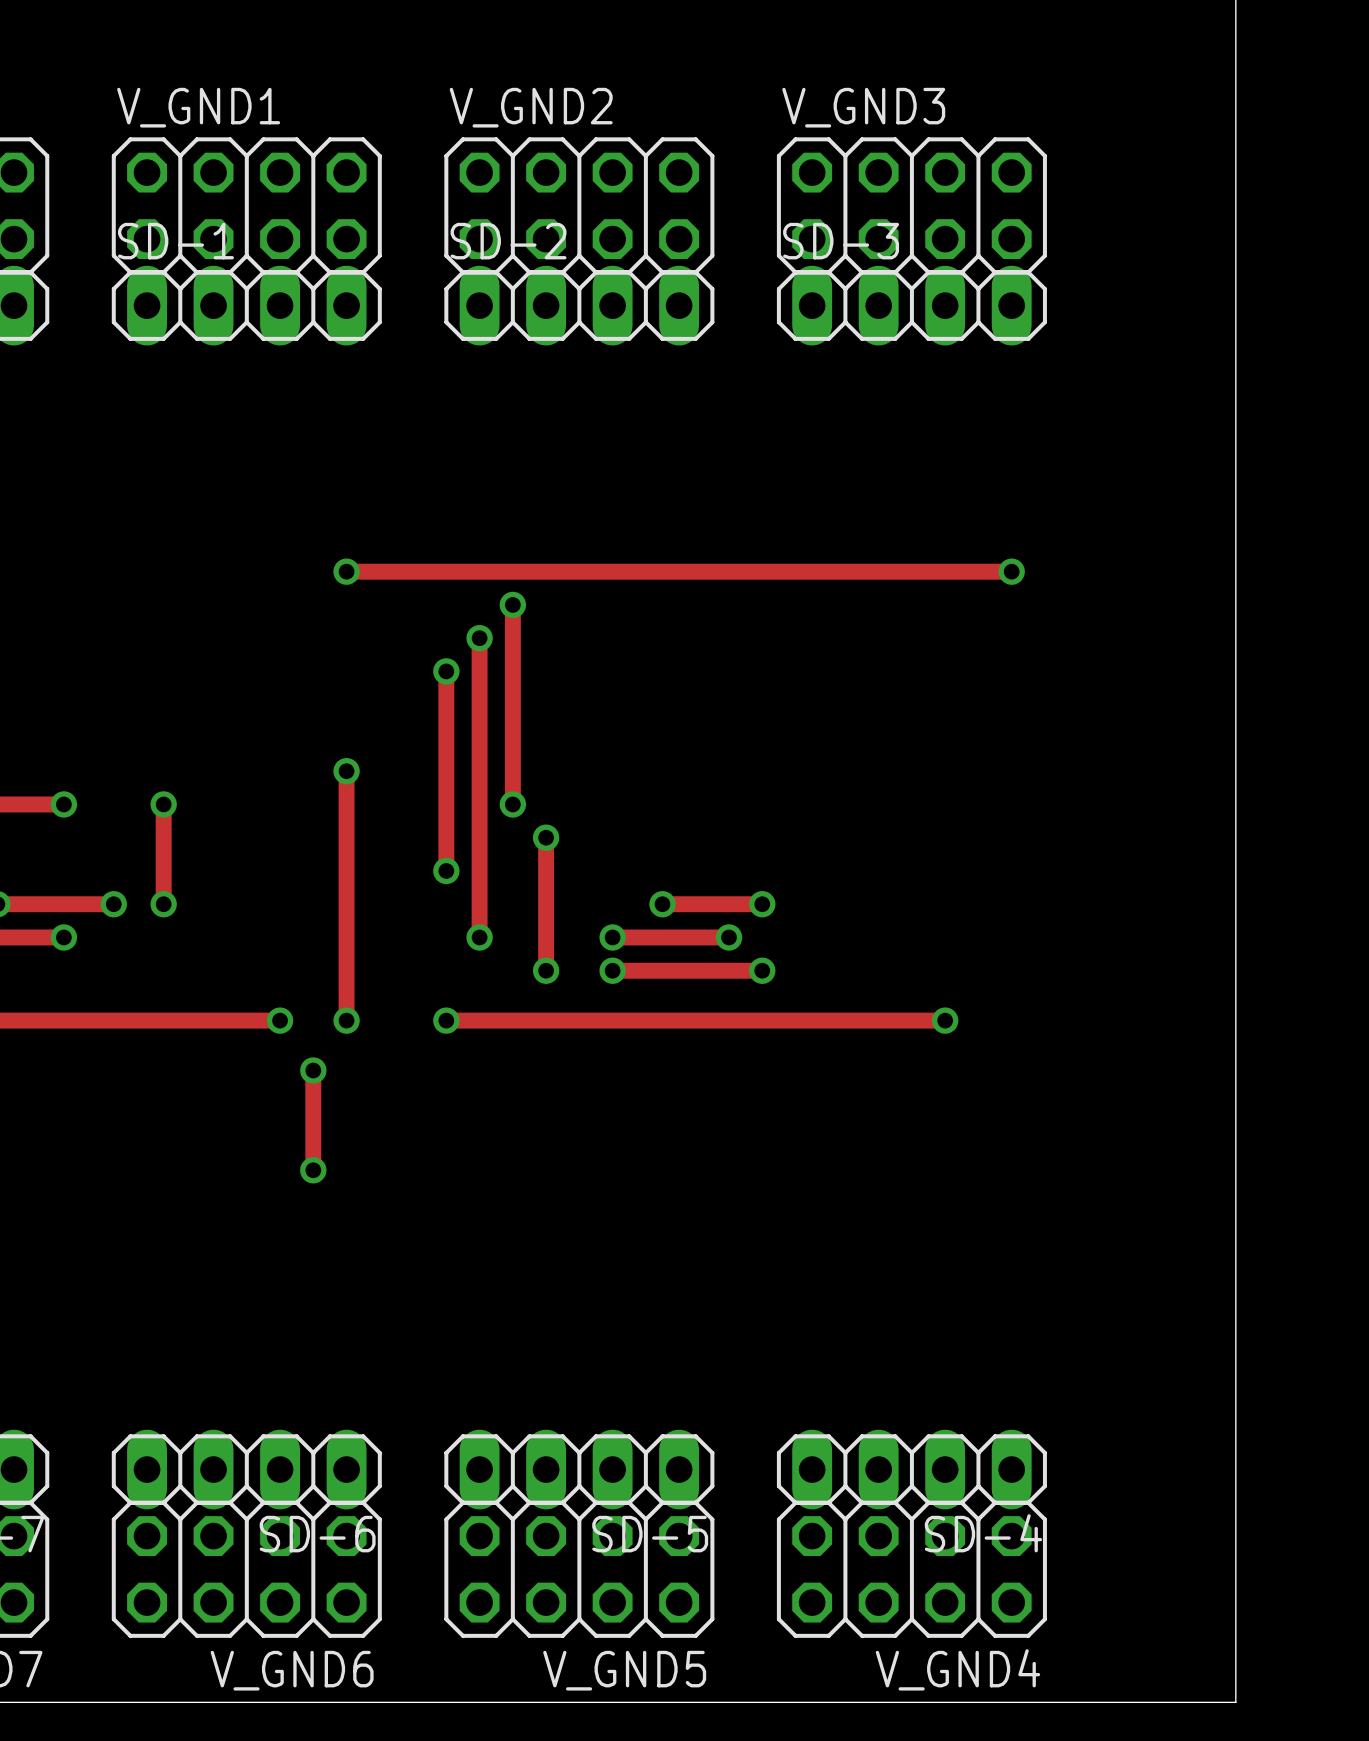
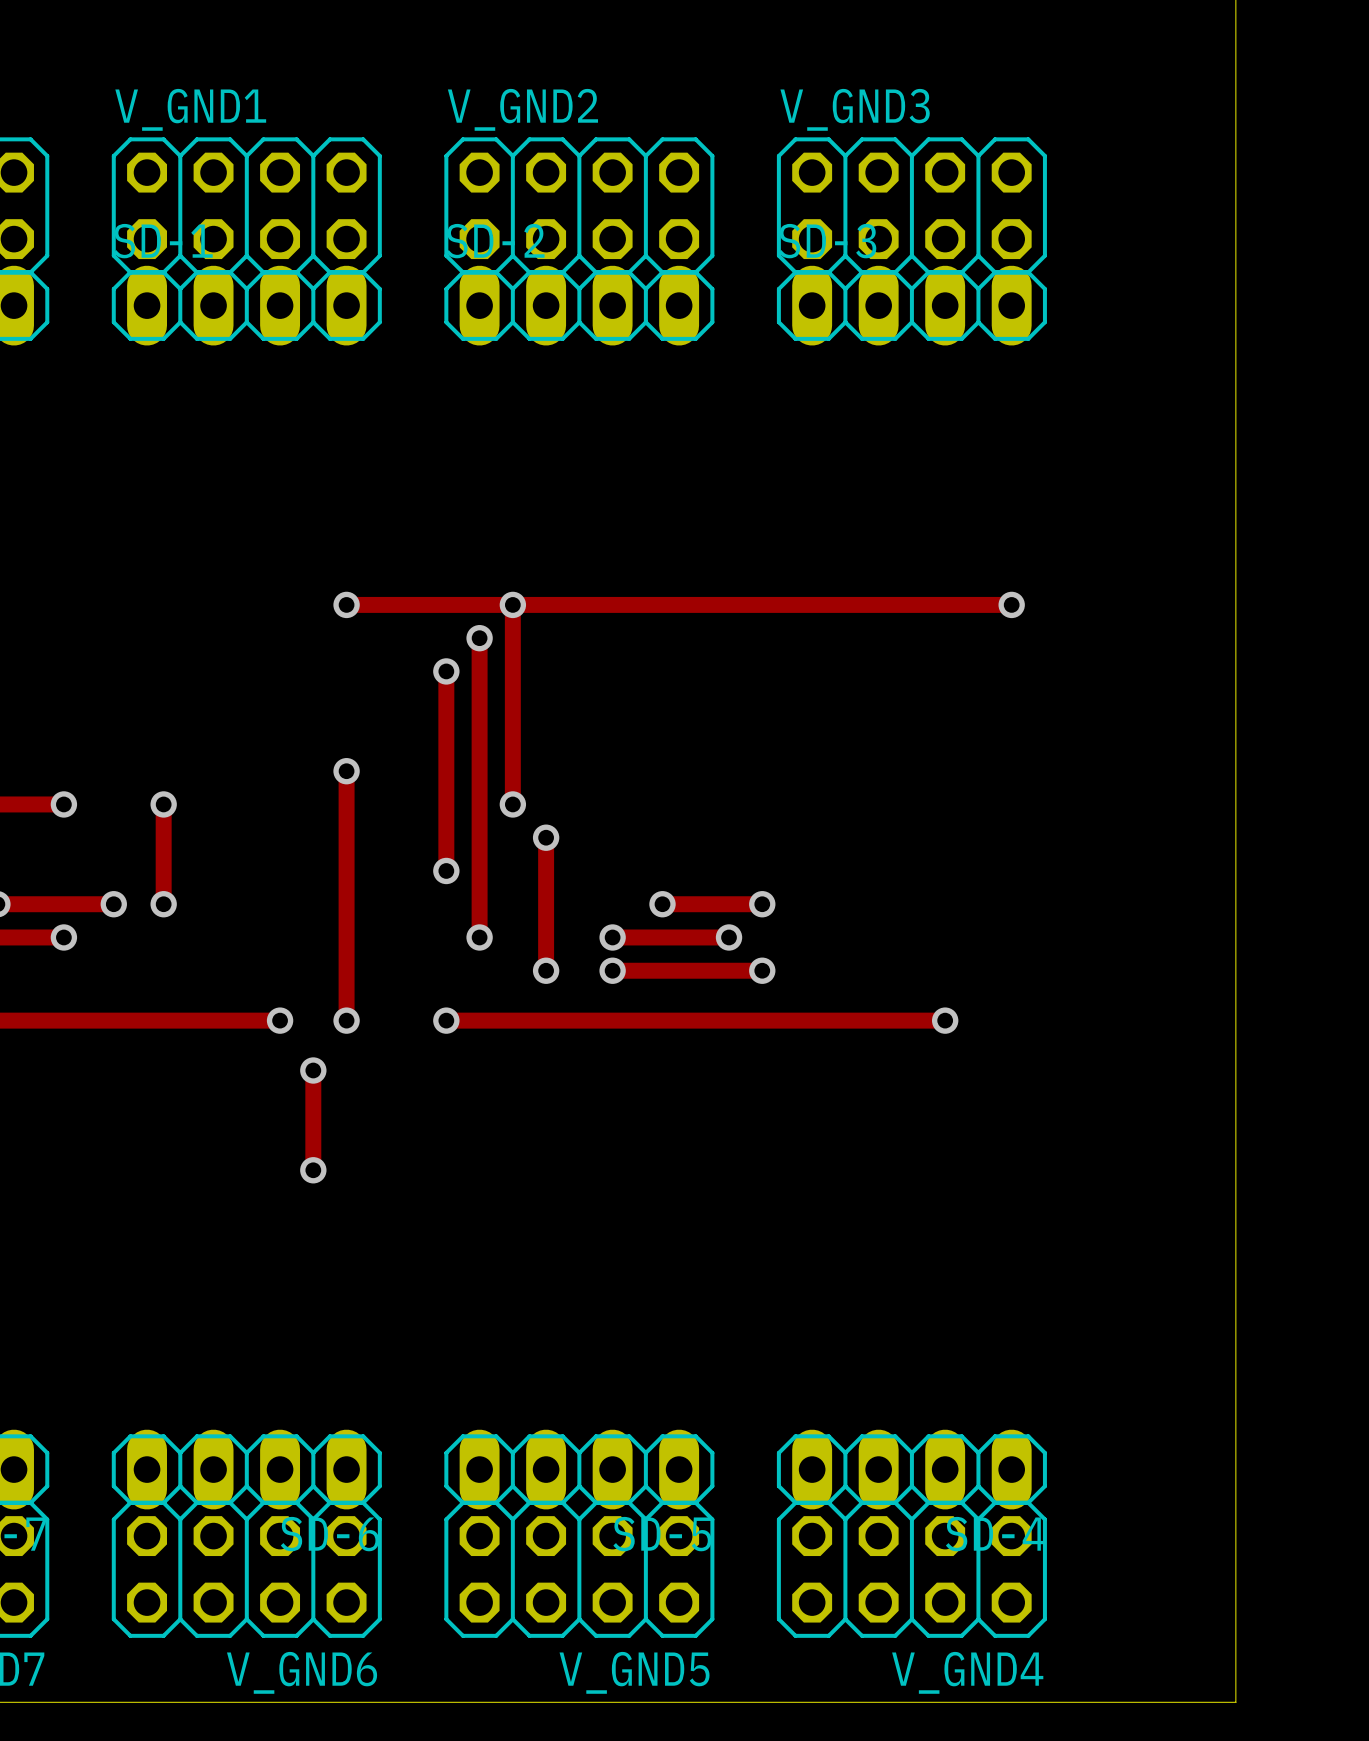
track: (346, 571) (1011, 571) -> (346, 604) (1011, 604)
via position: (346, 571) -> (346, 604)
via position: (1011, 571) -> (1011, 604)

